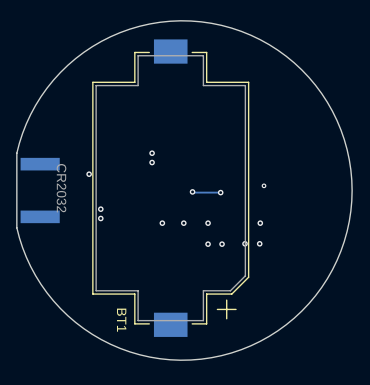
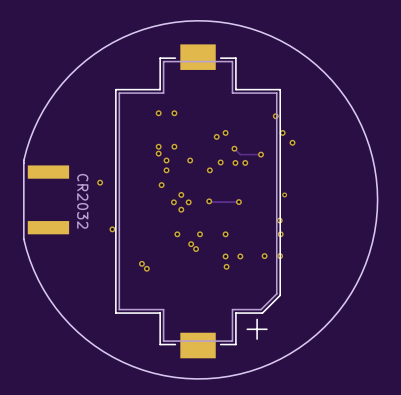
via: none -> (158, 113)
via: none -> (174, 113)
via: none -> (275, 116)
via: none -> (225, 132)
via: none -> (282, 132)
via: none -> (216, 136)
via: none -> (292, 142)
via: none -> (158, 146)
via: none -> (174, 146)
track: none -> (234, 148) (240, 154) (261, 154)
via: none -> (234, 148)
via: none -> (158, 153)
via: none -> (261, 154)
via: none -> (190, 160)
via: none -> (220, 162)
via: none -> (235, 162)
via: none -> (245, 162)
via: none -> (209, 170)
via: none -> (161, 185)
via: none -> (181, 194)
BT1: CR2032 (170, 188) -> none
part: none -> CR2032 (198, 201)
via: none -> (173, 202)
via: none -> (188, 202)
via: none -> (181, 209)
via: (100, 209) -> none
via: none -> (279, 220)
via: none -> (191, 244)
via: none -> (196, 249)
via: none -> (141, 263)
via: none -> (226, 266)
via: none -> (146, 268)

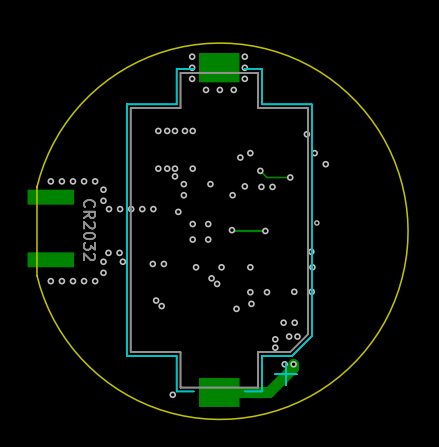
via: none -> (192, 56)
via: none -> (244, 56)
via: none -> (192, 67)
via: none -> (244, 67)
via: none -> (192, 78)
via: none -> (244, 78)
via: none -> (206, 89)
via: none -> (219, 89)
via: none -> (233, 89)
via: none -> (158, 130)
via: none -> (167, 130)
via: none -> (184, 130)
via: none -> (158, 168)
via: none -> (167, 168)
via: none -> (50, 181)
via: none -> (61, 181)
via: none -> (72, 181)
via: none -> (84, 181)
via: none -> (95, 181)
board edge: (23, 160) (23, 239) (33, 270) (43, 289) (62, 316) (85, 339) (113, 357) (153, 373) (185, 378) (218, 377) (250, 371) (290, 353) (324, 327) (345, 302) (361, 273) (372, 243) (377, 210) (374, 167) (365, 135) (351, 106) (331, 80) (308, 58) (270, 36) (239, 25) (196, 20) (164, 24) (132, 33) (103, 47) (69, 75) (49, 100) (33, 129) (23, 160) -> (36, 186) (48, 153) (73, 112) (98, 87) (127, 67) (160, 52) (194, 44) (230, 43) (265, 48) (299, 60) (329, 78) (356, 101) (378, 130) (398, 172) (406, 207) (407, 243) (402, 278) (389, 311) (371, 342) (339, 376) (309, 396) (276, 410) (242, 418) (206, 418) (171, 413) (138, 400) (107, 382) (81, 358) (59, 330) (48, 309) (36, 275) (36, 186)
via: none -> (103, 189)
via: none -> (103, 200)
via: none -> (120, 209)
via: none -> (131, 209)
via: none -> (142, 209)
via: none -> (153, 209)
via: (181, 194) -> none
via: none -> (192, 224)
via: none -> (208, 224)
part: CR2032 (198, 201) -> none
part: none -> CR2032 (219, 230)
part: none -> CR2032 (219, 230)
via: (173, 202) -> none
via: (188, 202) -> none
via: none -> (192, 239)
via: (181, 209) -> none
via: none -> (208, 239)
via: none -> (108, 252)
via: none -> (119, 252)
via: none -> (103, 261)
via: none -> (152, 263)
via: none -> (163, 263)
via: none -> (103, 272)
via: none -> (50, 281)
via: none -> (61, 281)
via: none -> (72, 281)
via: none -> (84, 281)
via: none -> (95, 281)
via: none -> (236, 308)
via: none -> (283, 322)
via: none -> (294, 322)
via: none -> (289, 336)
via: none -> (297, 336)
via: none -> (275, 339)
via: none -> (275, 347)
via: none -> (284, 364)
track: none -> (293, 364) (293, 368) (269, 392) (219, 392)
via: none -> (293, 364)
via: none -> (172, 394)

